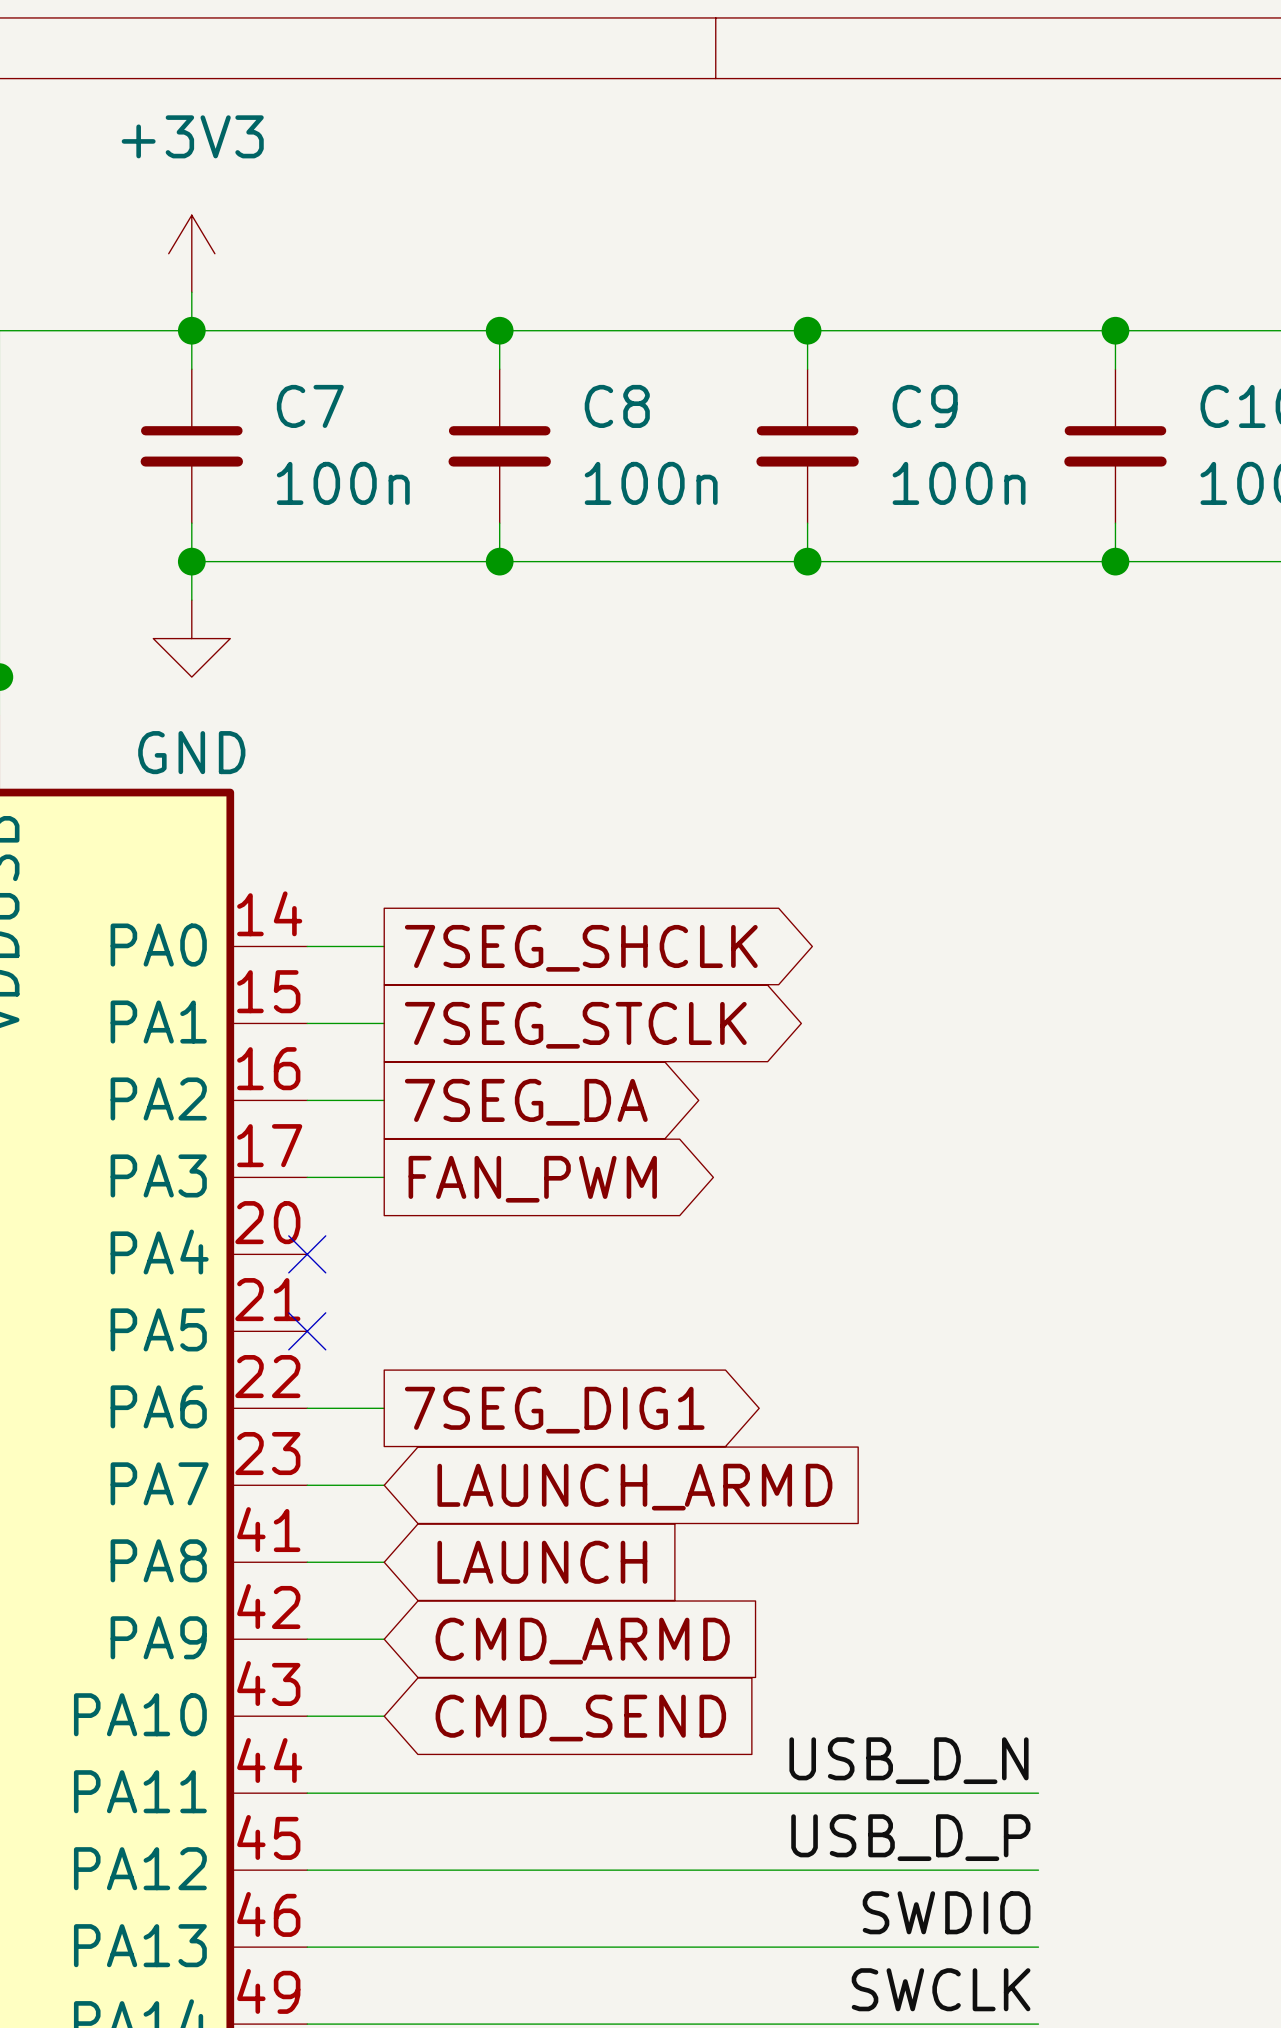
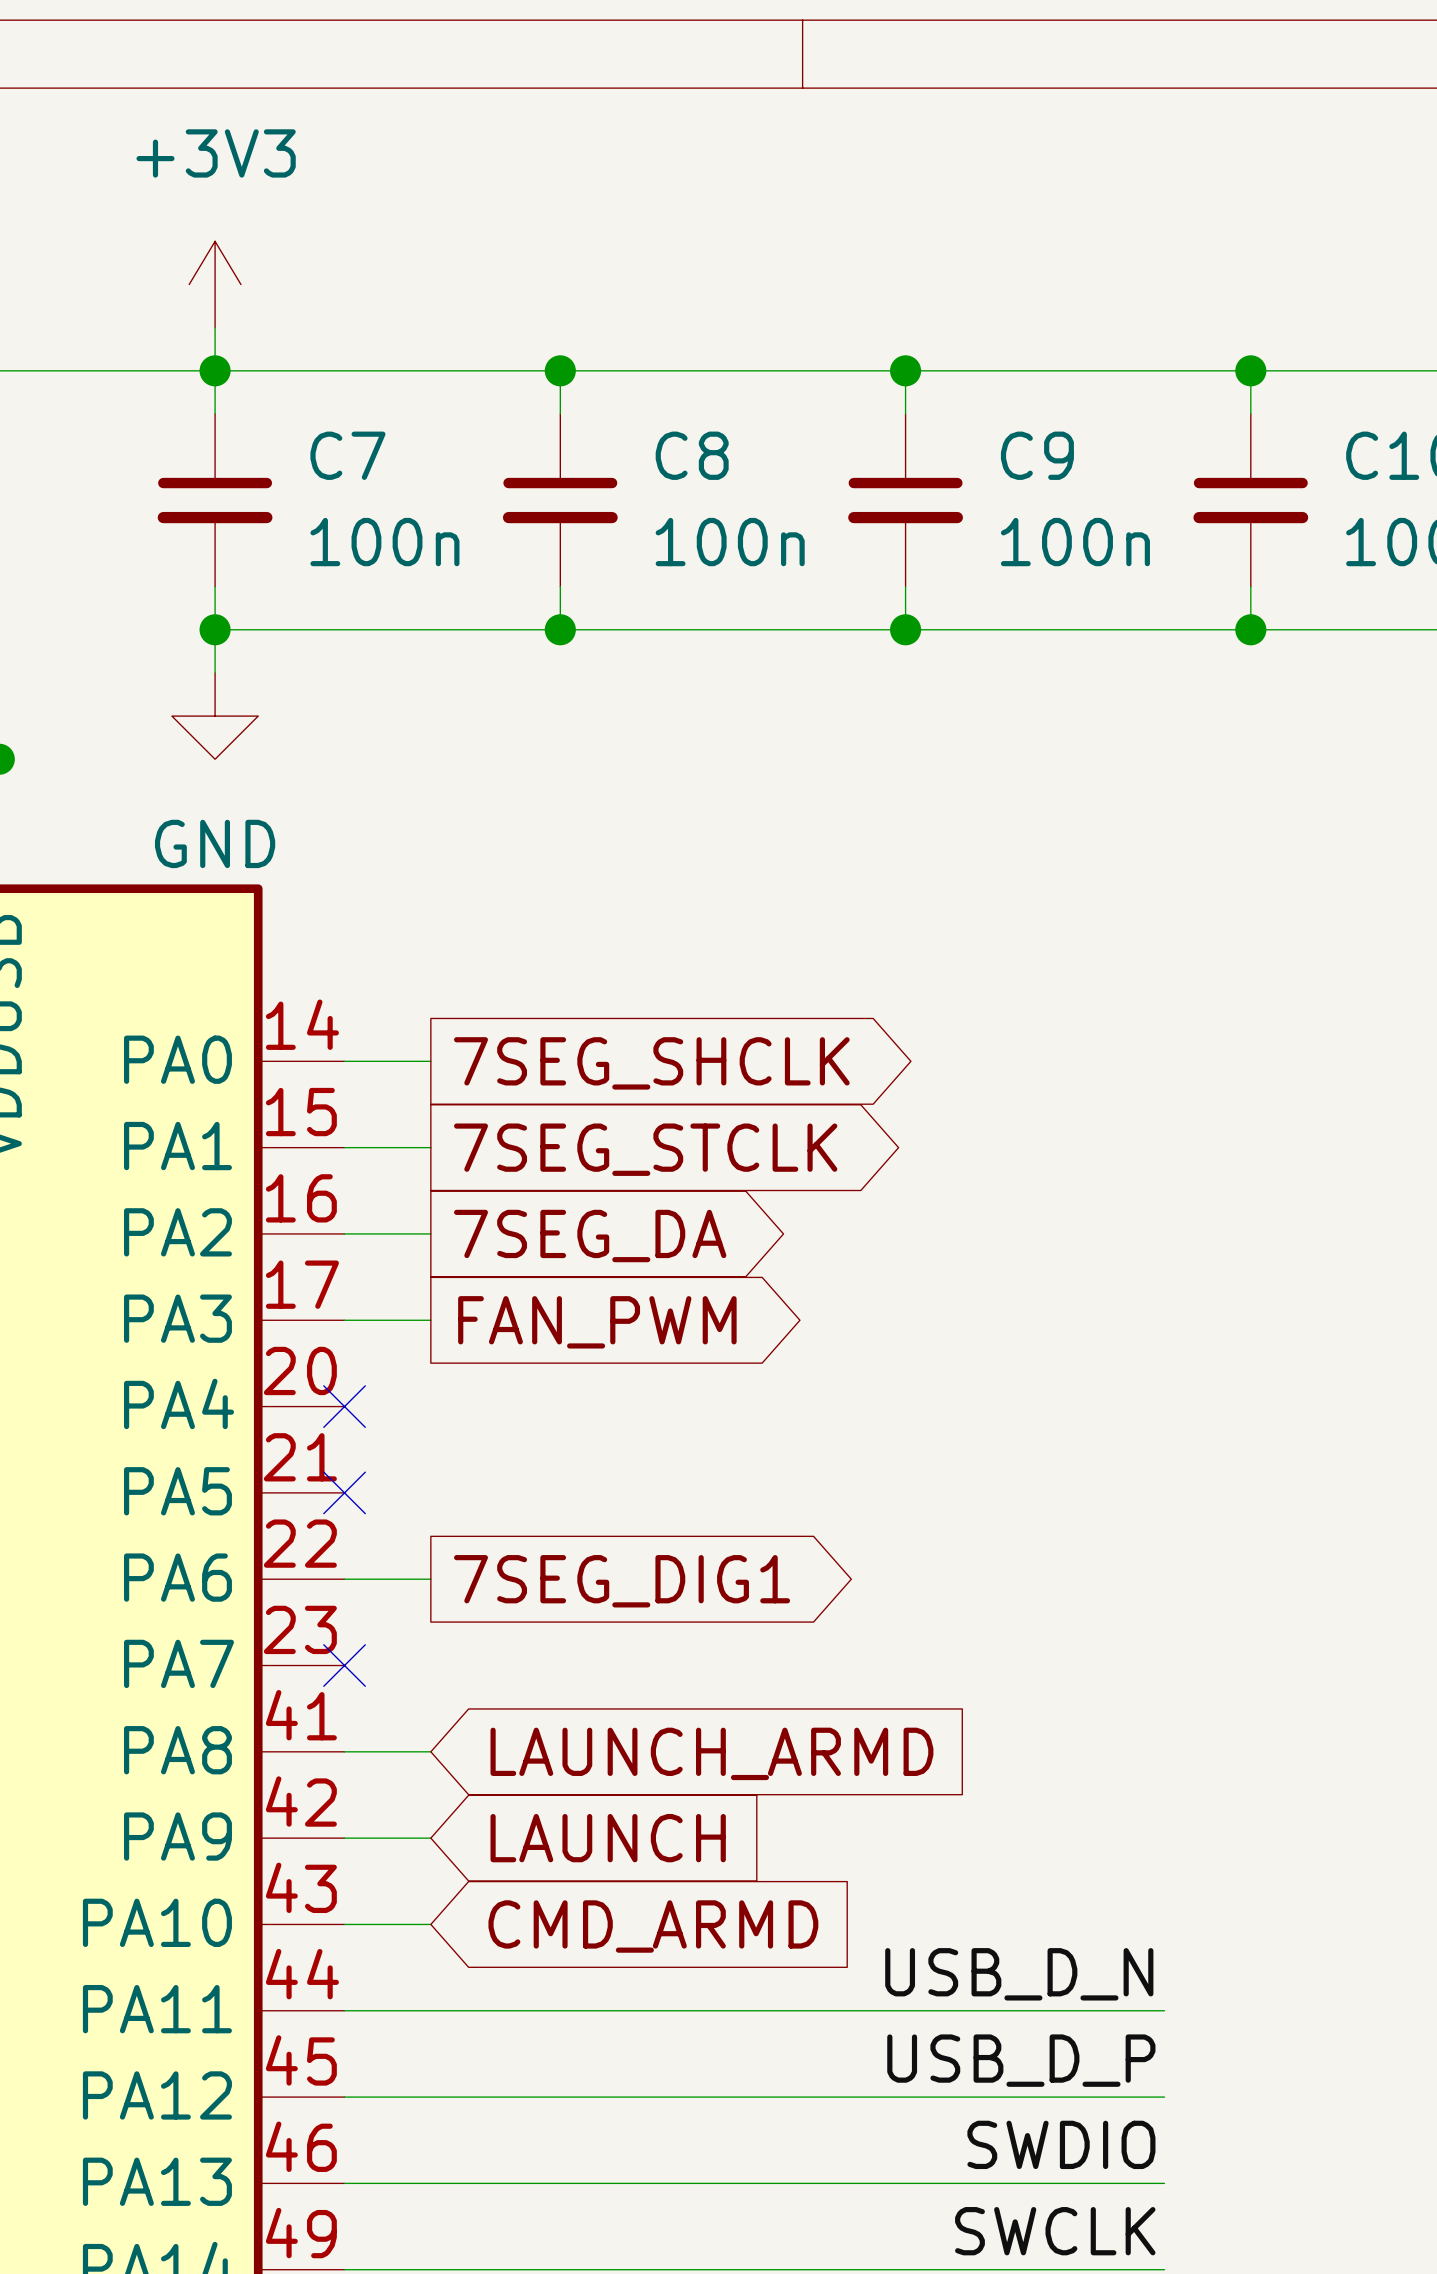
wire: (307, 1485) (384, 1485) -> none
no-connect mark: none -> (344, 1665)
global label: LAUNCH_ARMD (634, 1487) -> none
global label: LAUNCH (542, 1562) -> LAUNCH_ARMD (711, 1753)
global label: CMD_ARMD (582, 1641) -> LAUNCH (608, 1838)
global label: CMD_SEND (580, 1718) -> CMD_ARMD (653, 1926)

